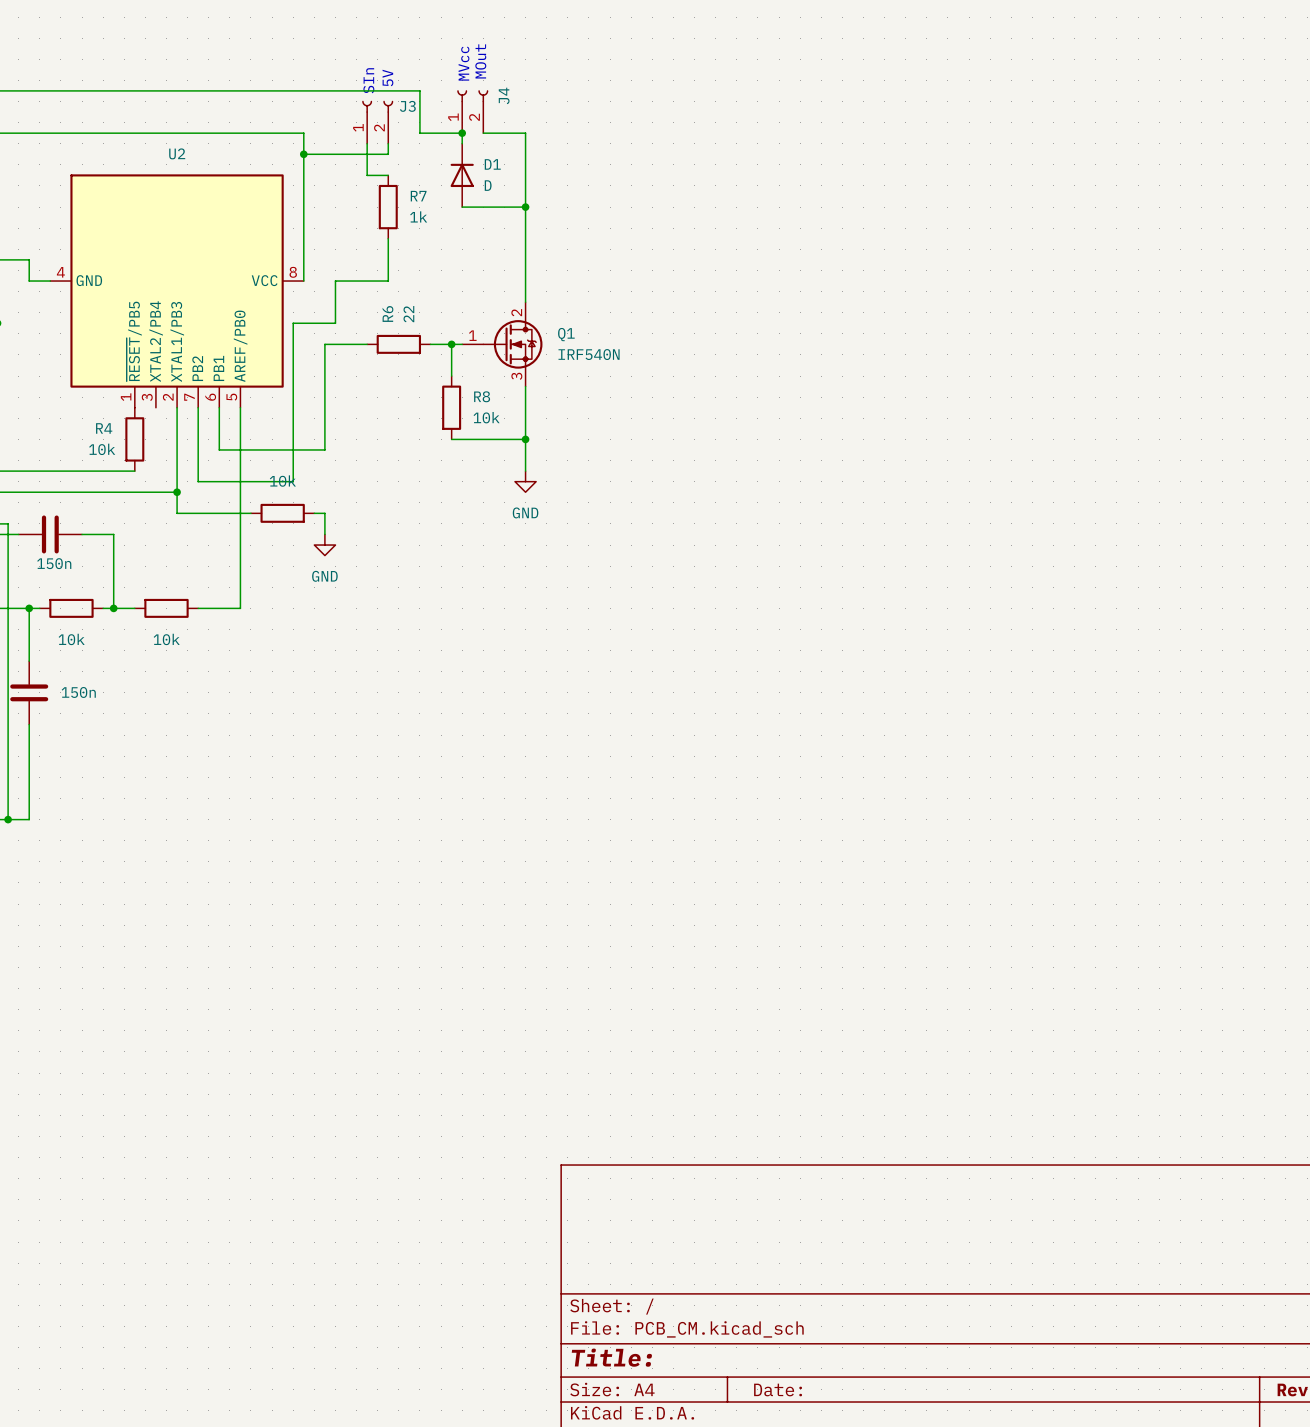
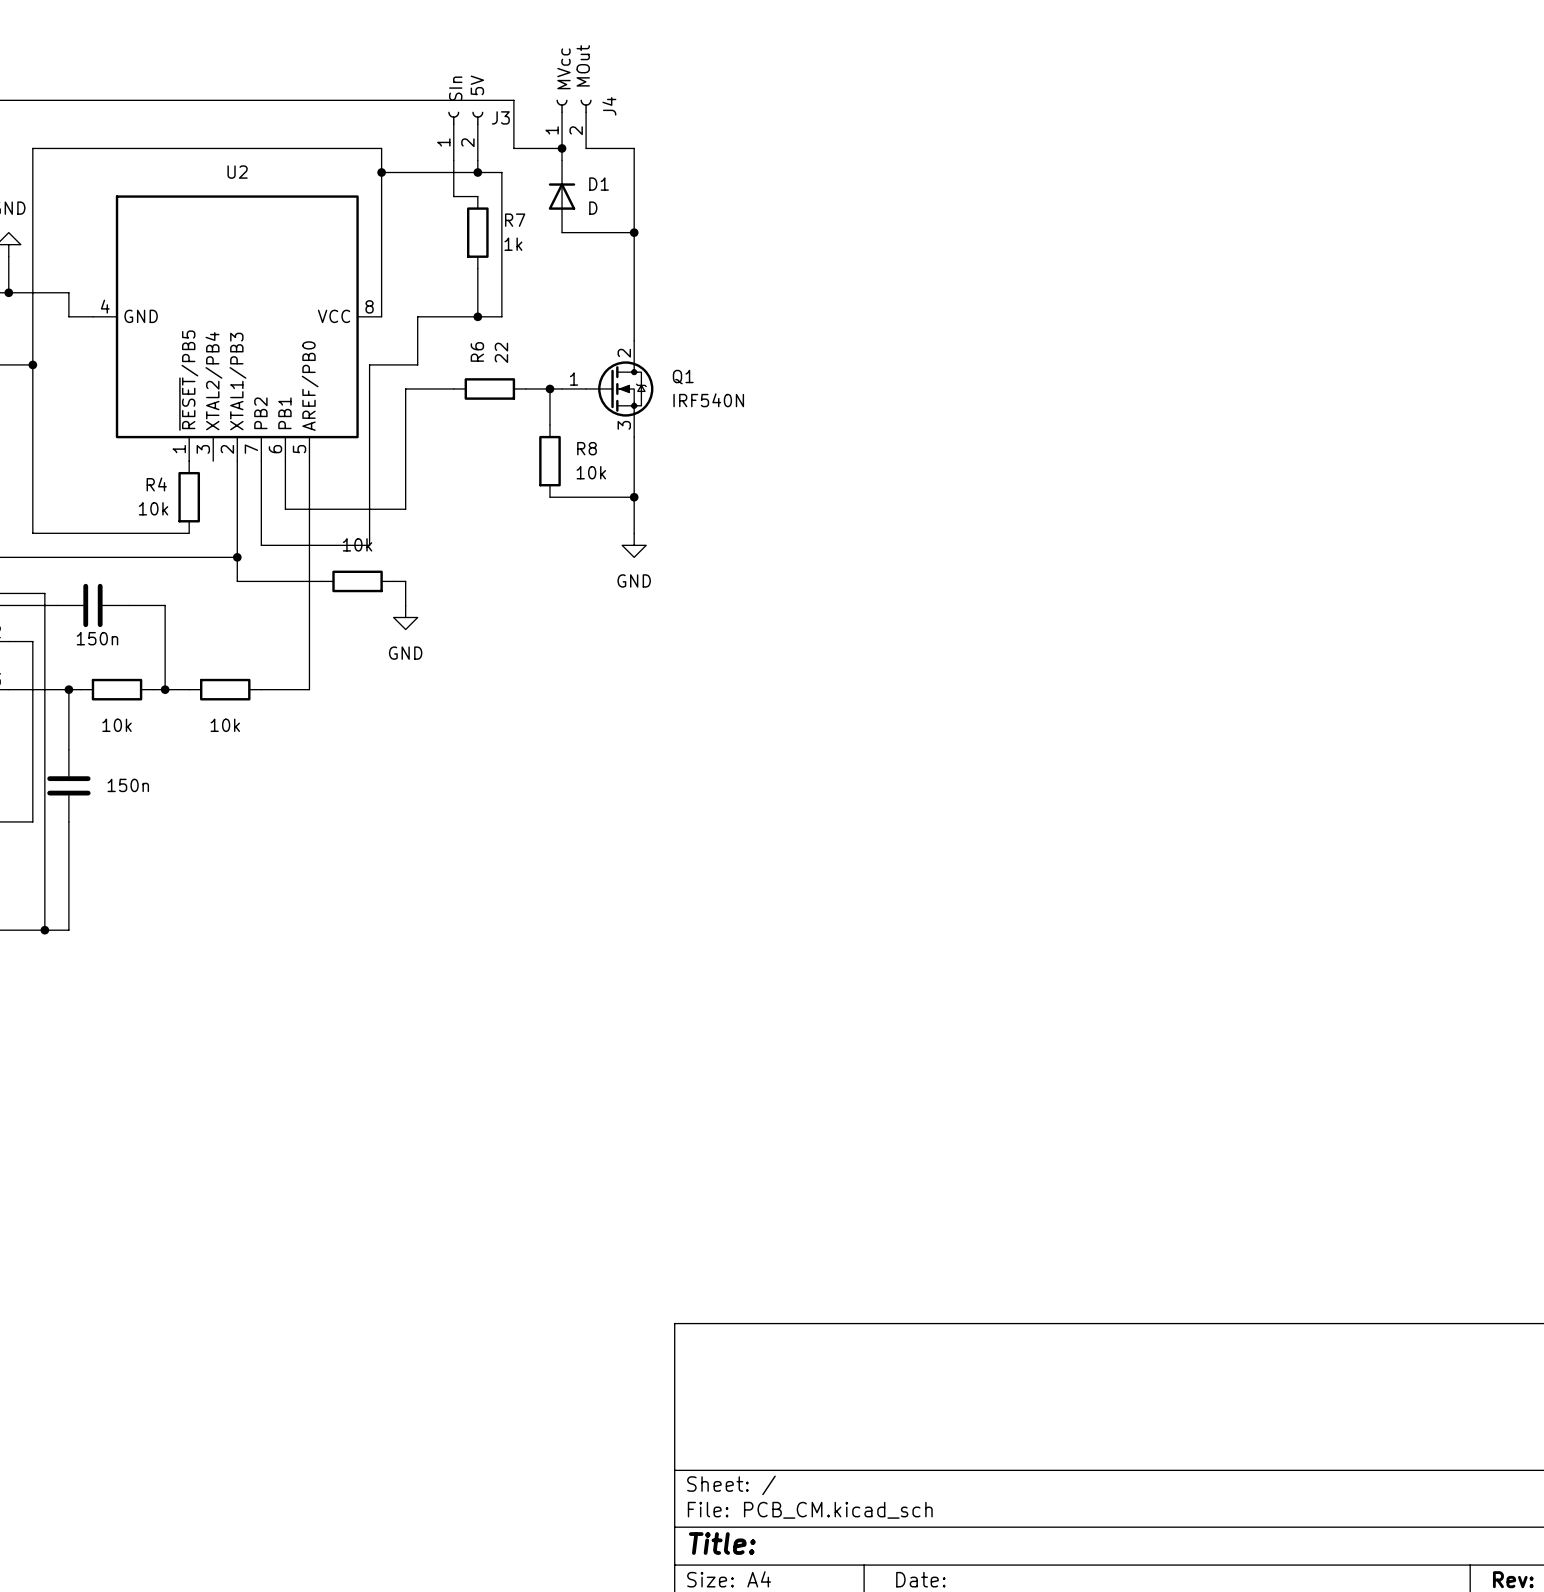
wire: none -> (477, 172) (501, 172) (501, 316) (477, 316)
junction: none -> (477, 172)
junction: none -> (477, 316)

